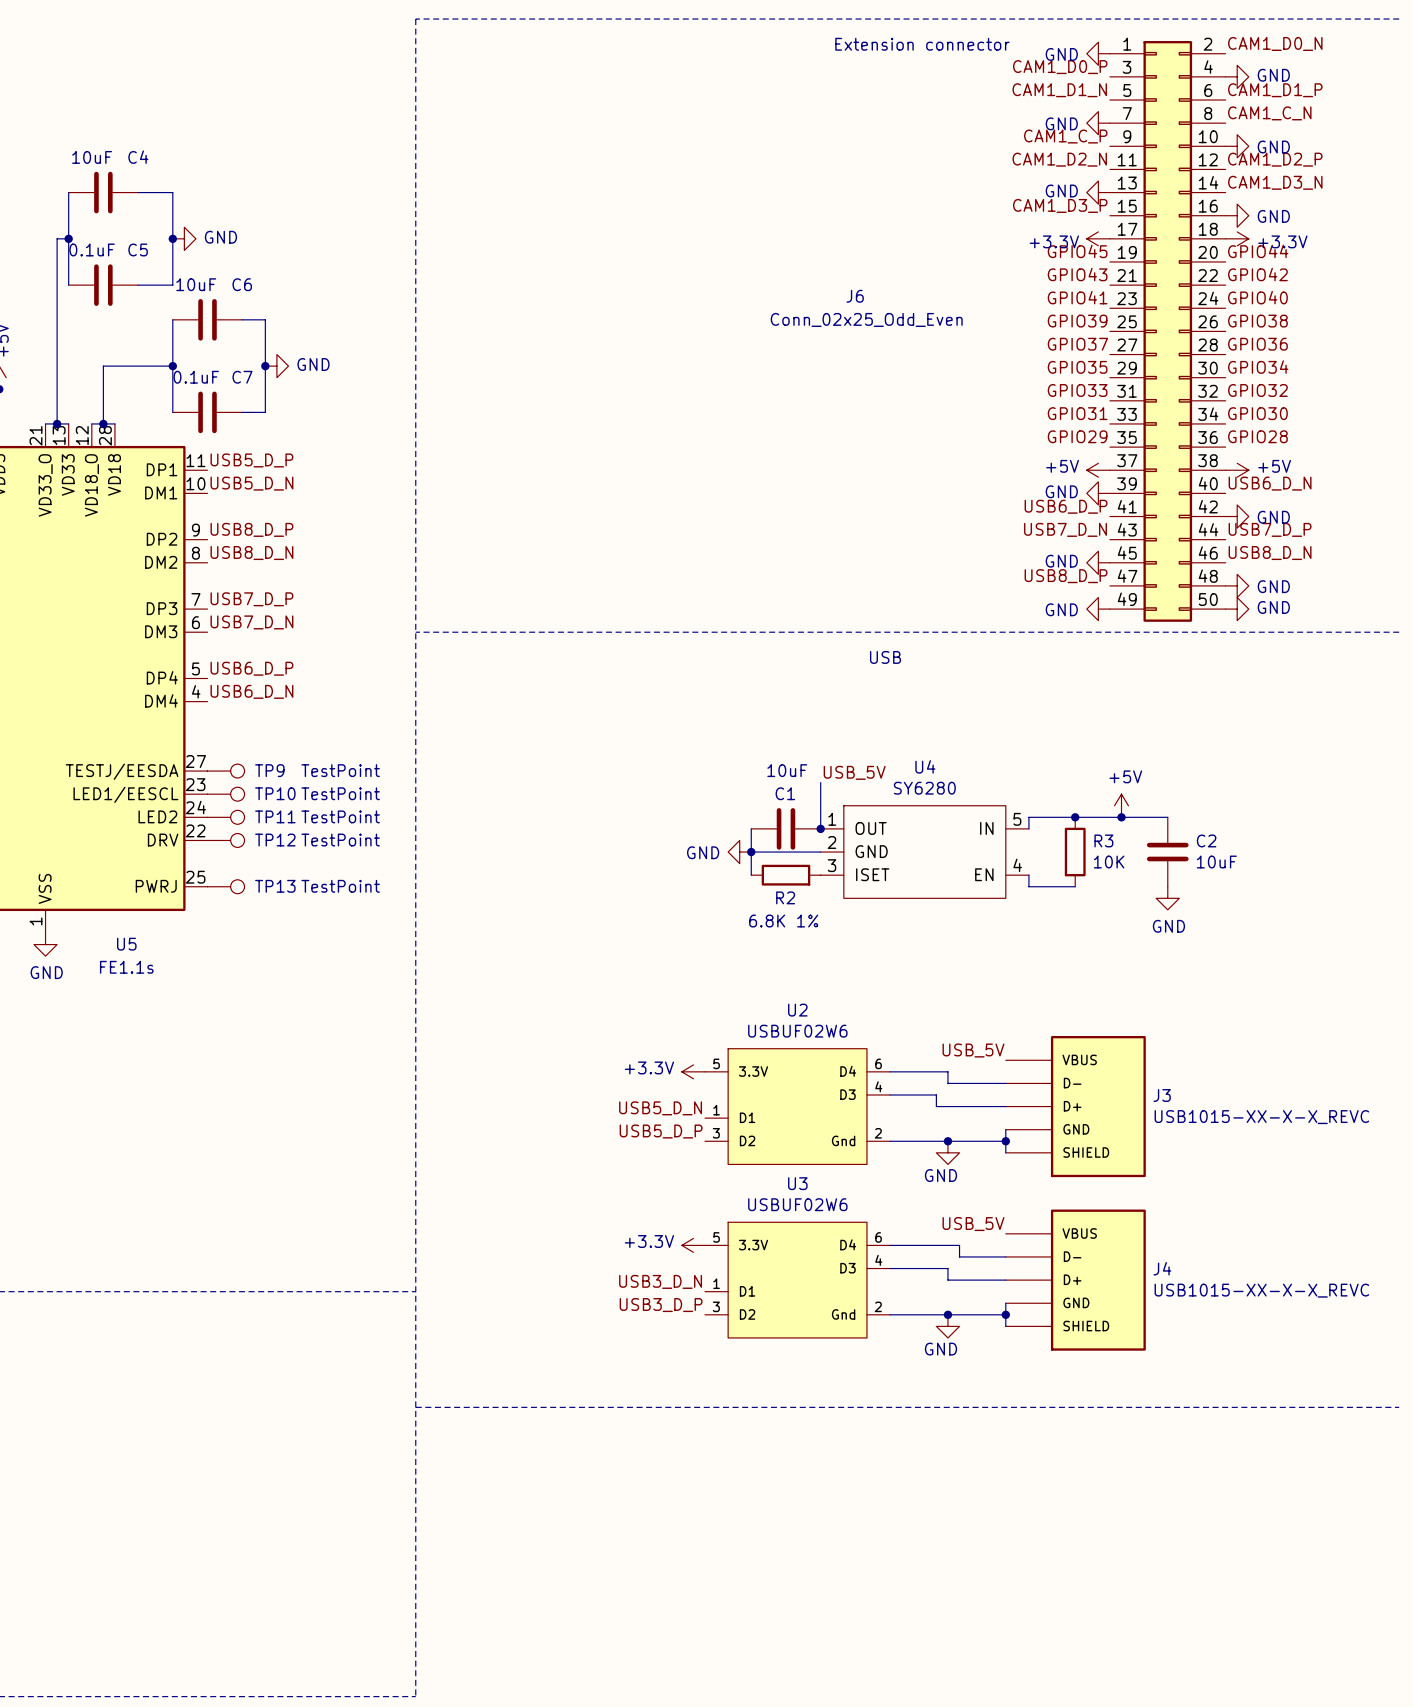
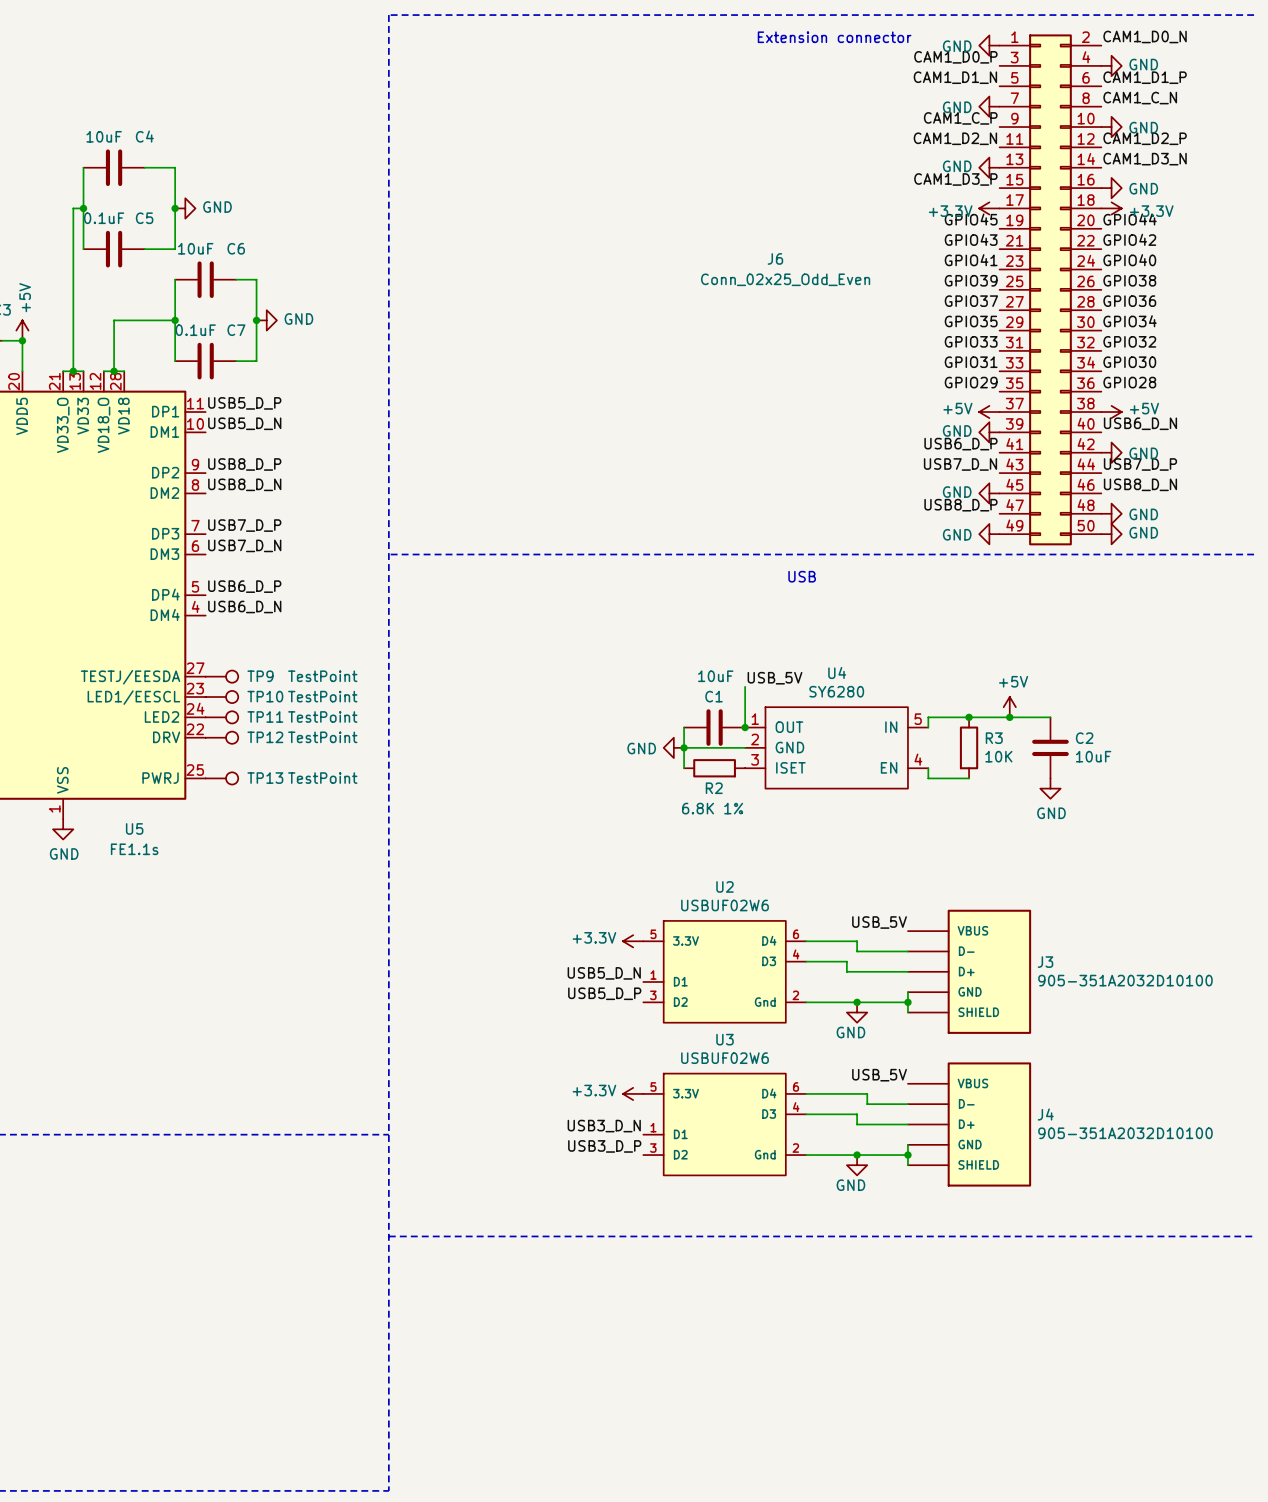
J3 value: USB1015-XX-X-X_REVC (1261, 1117) -> 905-351A2032D10100 (1125, 980)
J4 value: USB1015-XX-X-X_REVC (1261, 1290) -> 905-351A2032D10100 (1125, 1133)

